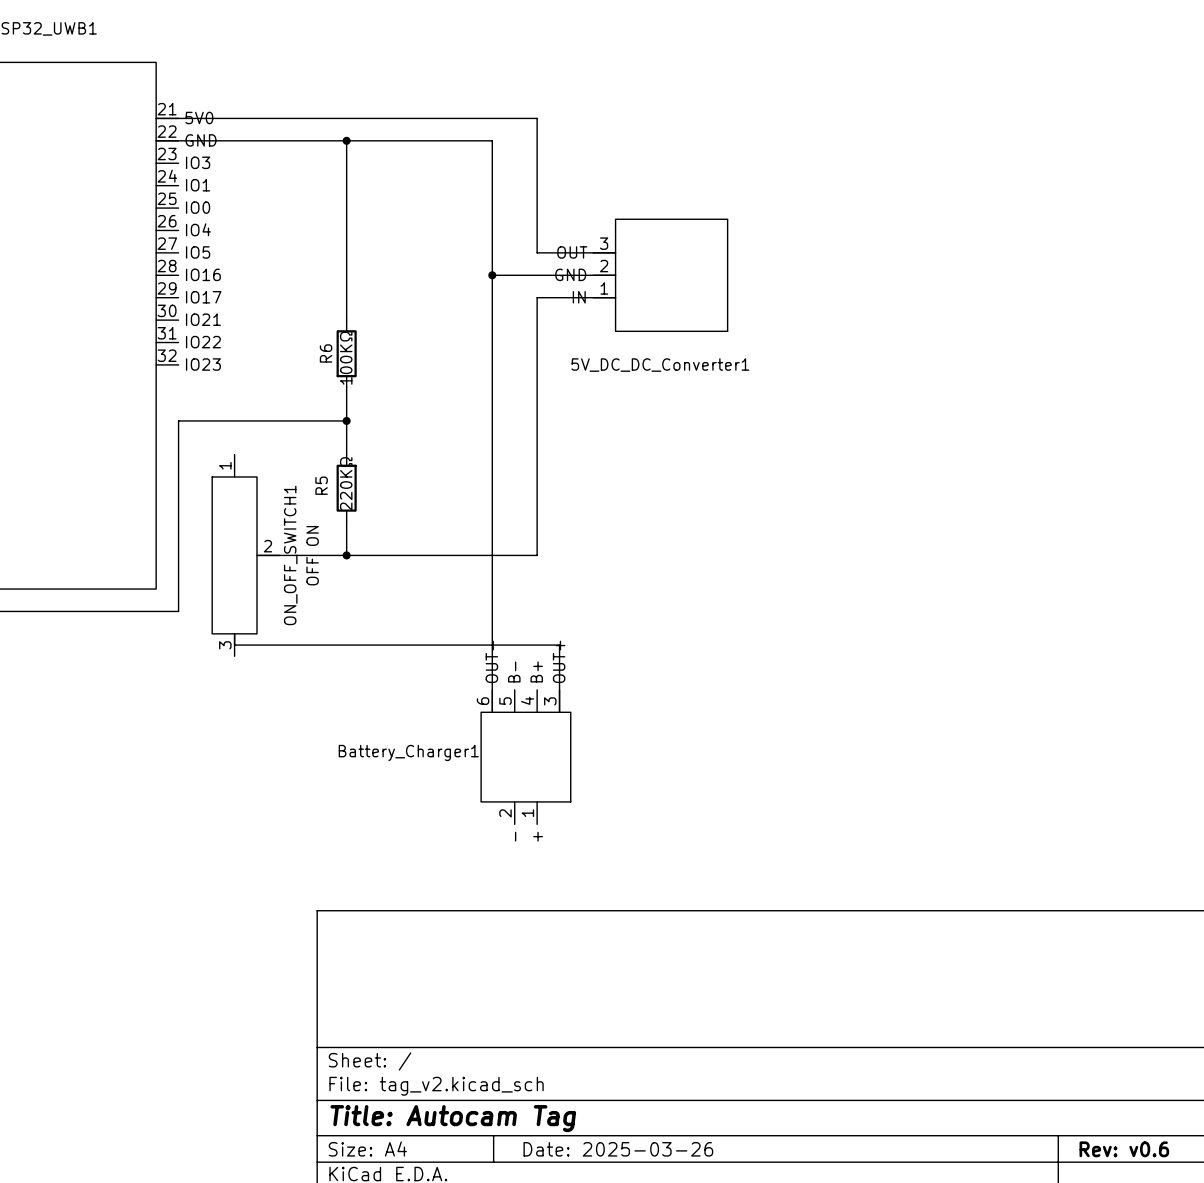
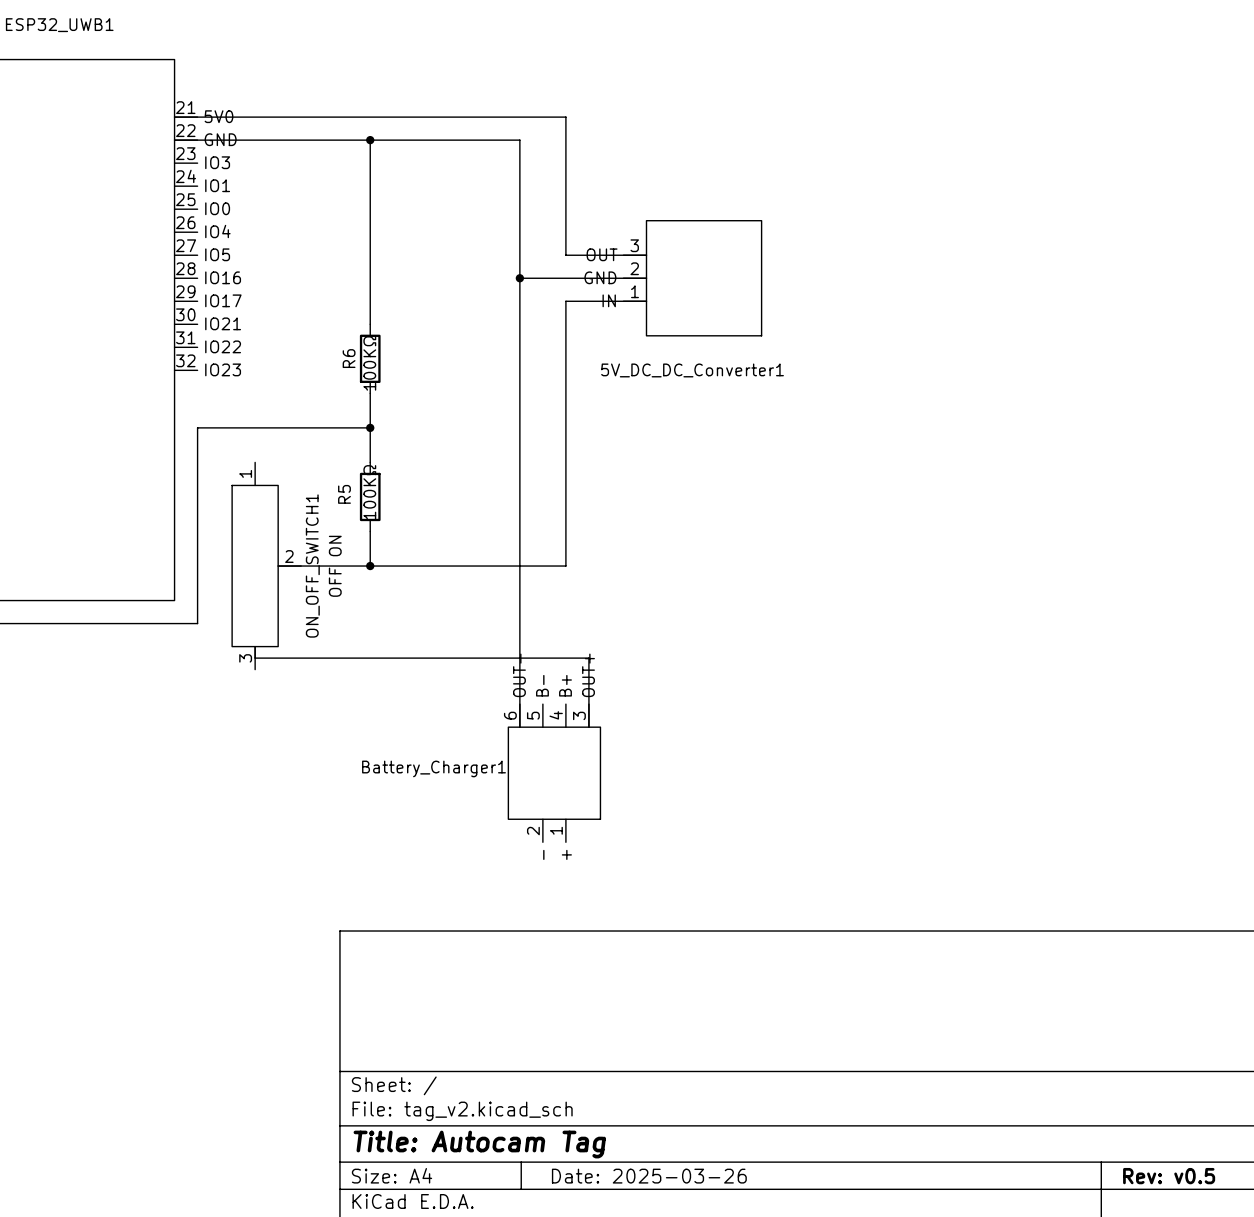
R5 value: 220KΩ (346, 483) -> 100KΩ (369, 492)
title block: Rev: v0.6 (1124, 1149) -> Rev: v0.5 (1169, 1176)

